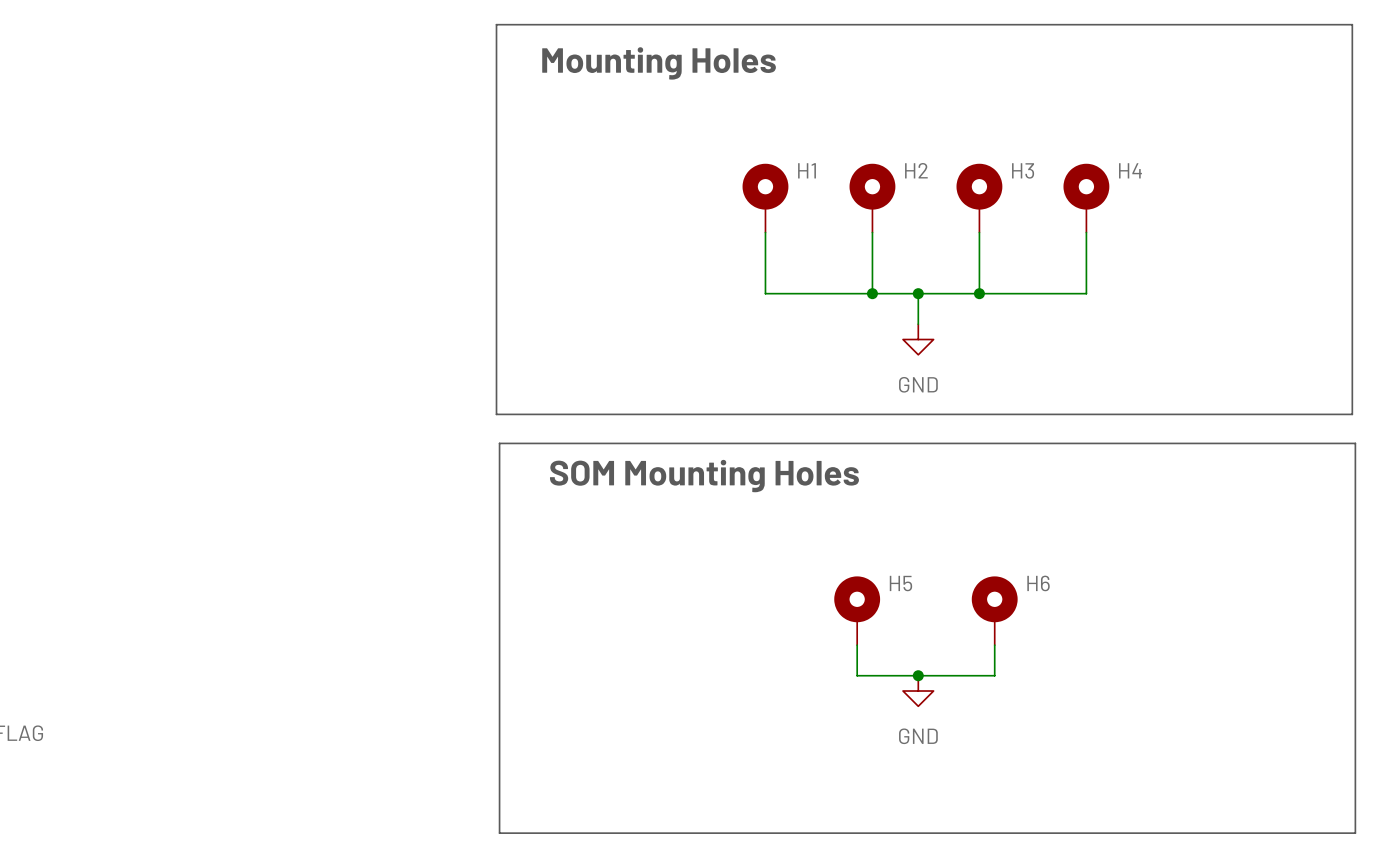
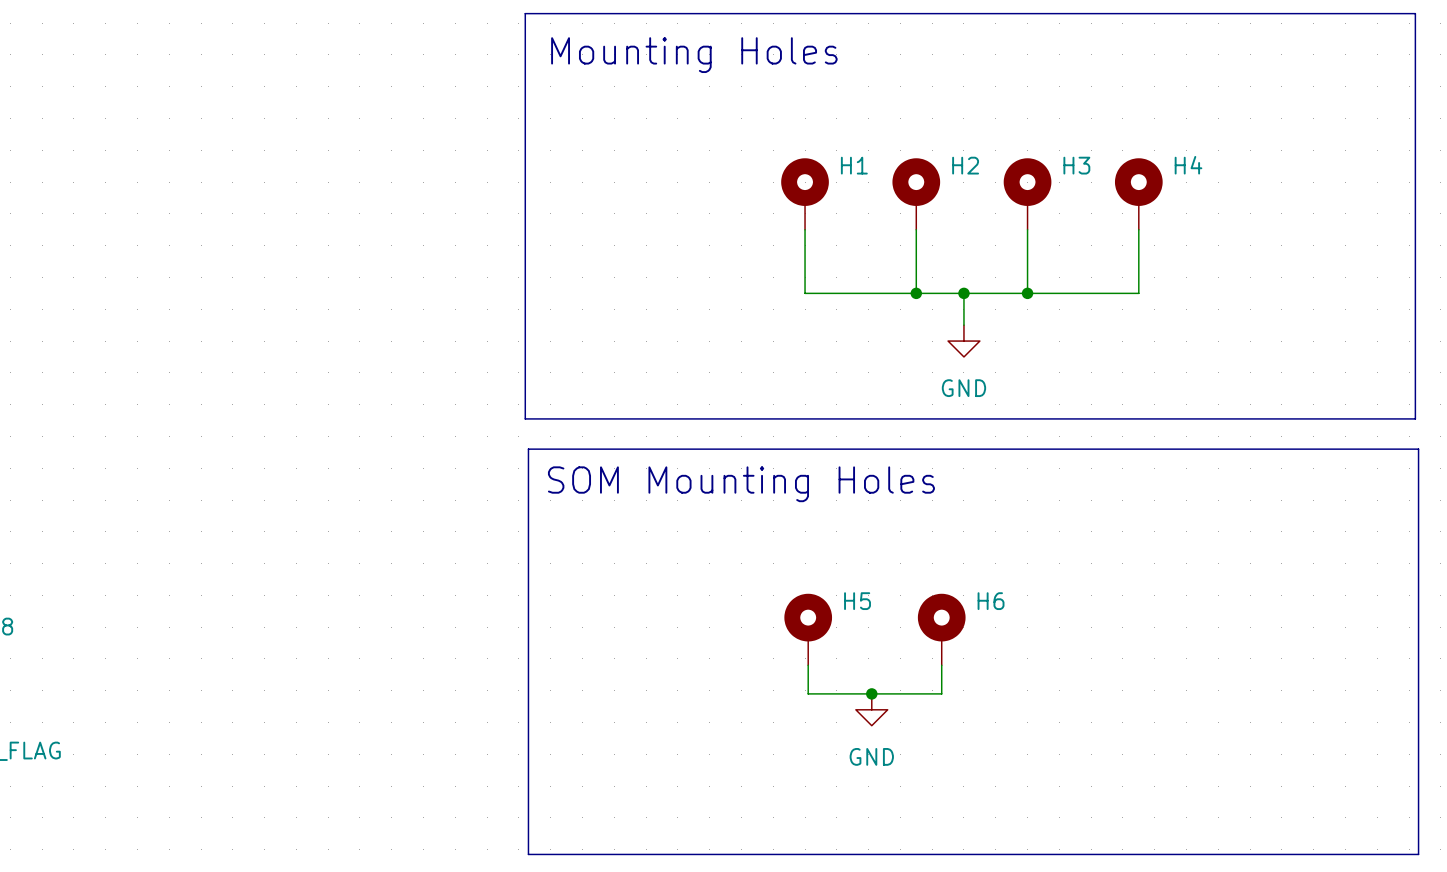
H5 position: (857, 610) -> (808, 629)
H6 position: (994, 610) -> (941, 629)
wire: (857, 645) (857, 675) (994, 675) (994, 645) -> none
wire: none -> (808, 665) (808, 693) (941, 693) (941, 665)
junction: (918, 675) -> none
junction: none -> (871, 693)
power symbol position: GND (918, 691) -> GND (871, 709)

